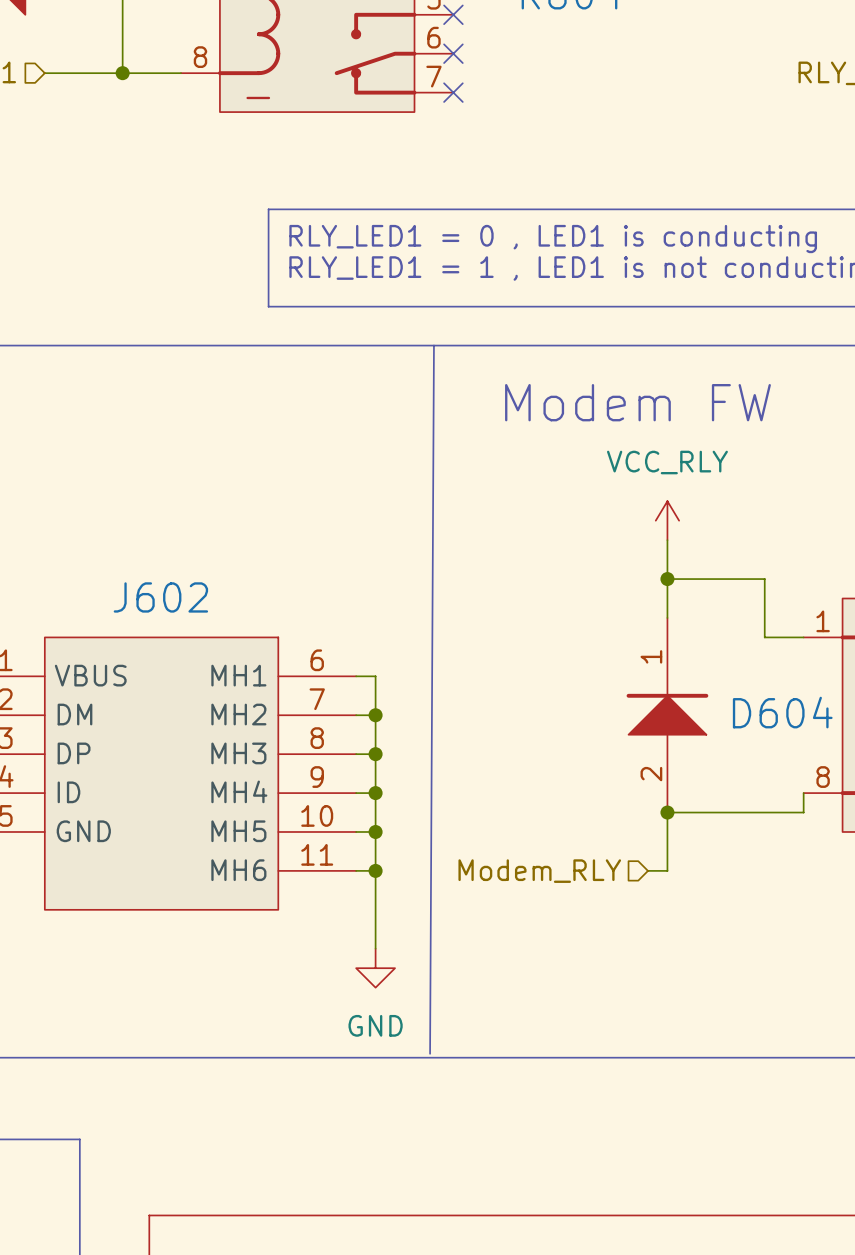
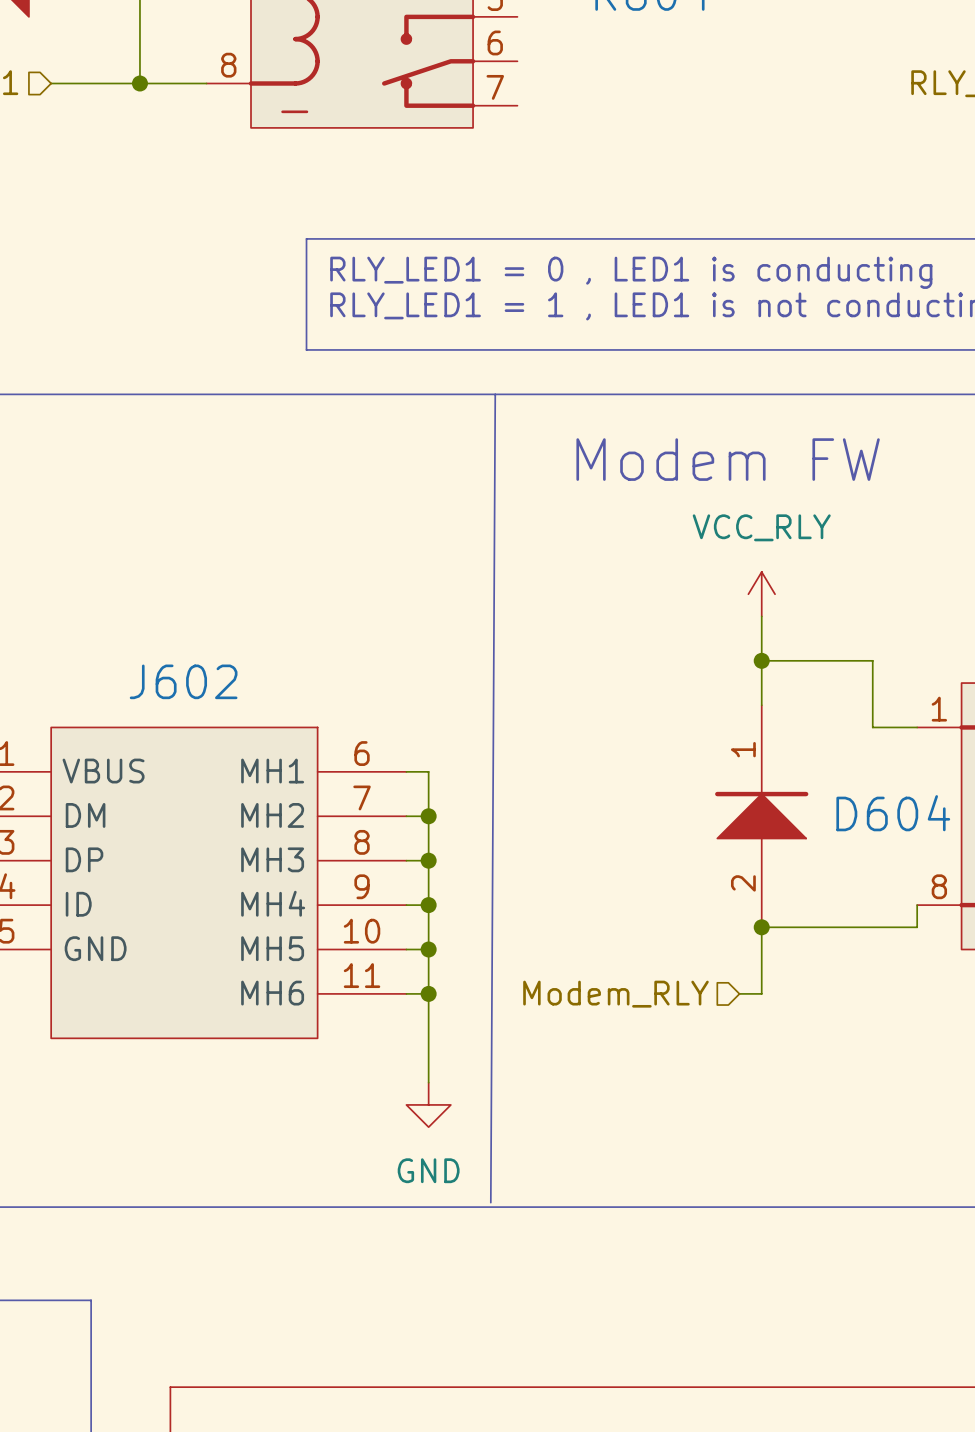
no-connect mark: (453, 14) -> none
no-connect mark: (453, 53) -> none
no-connect mark: (453, 92) -> none

